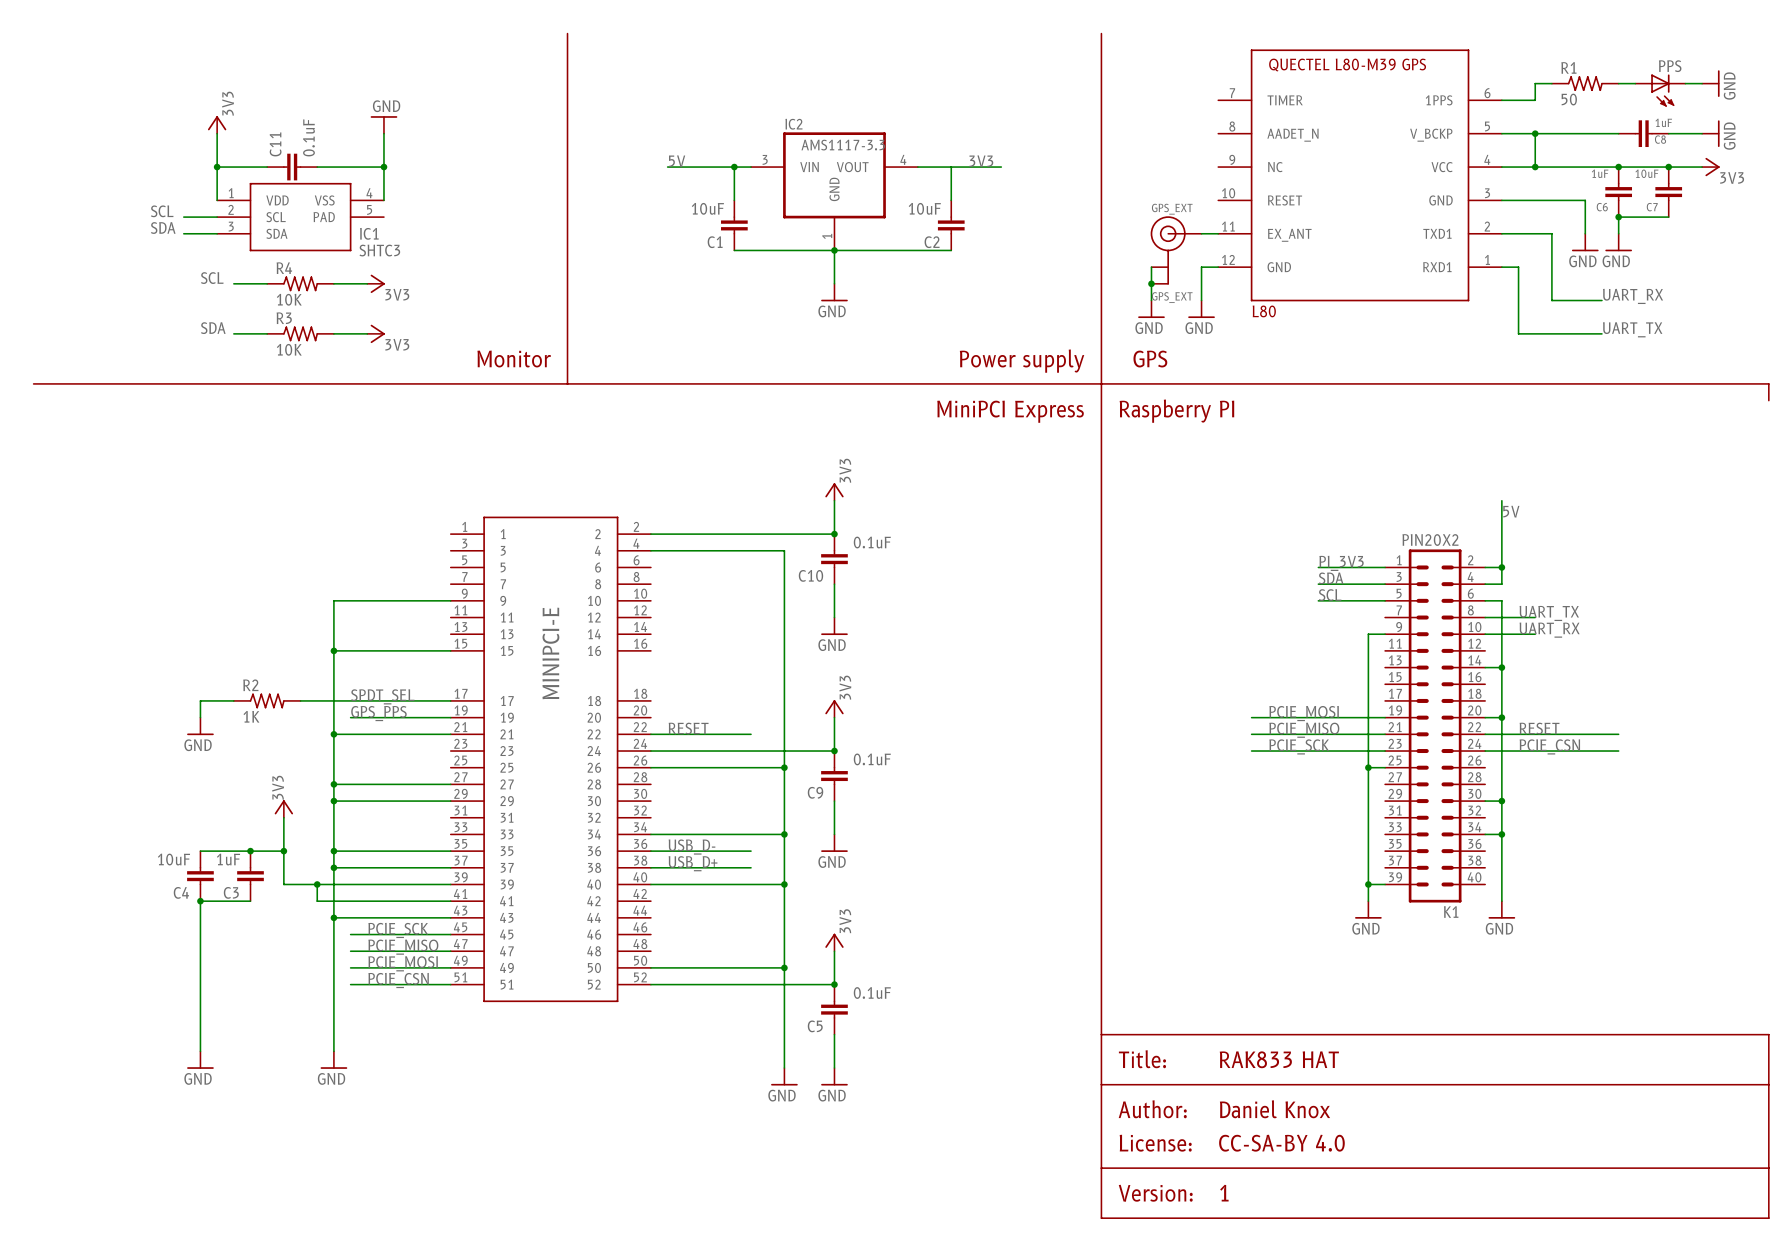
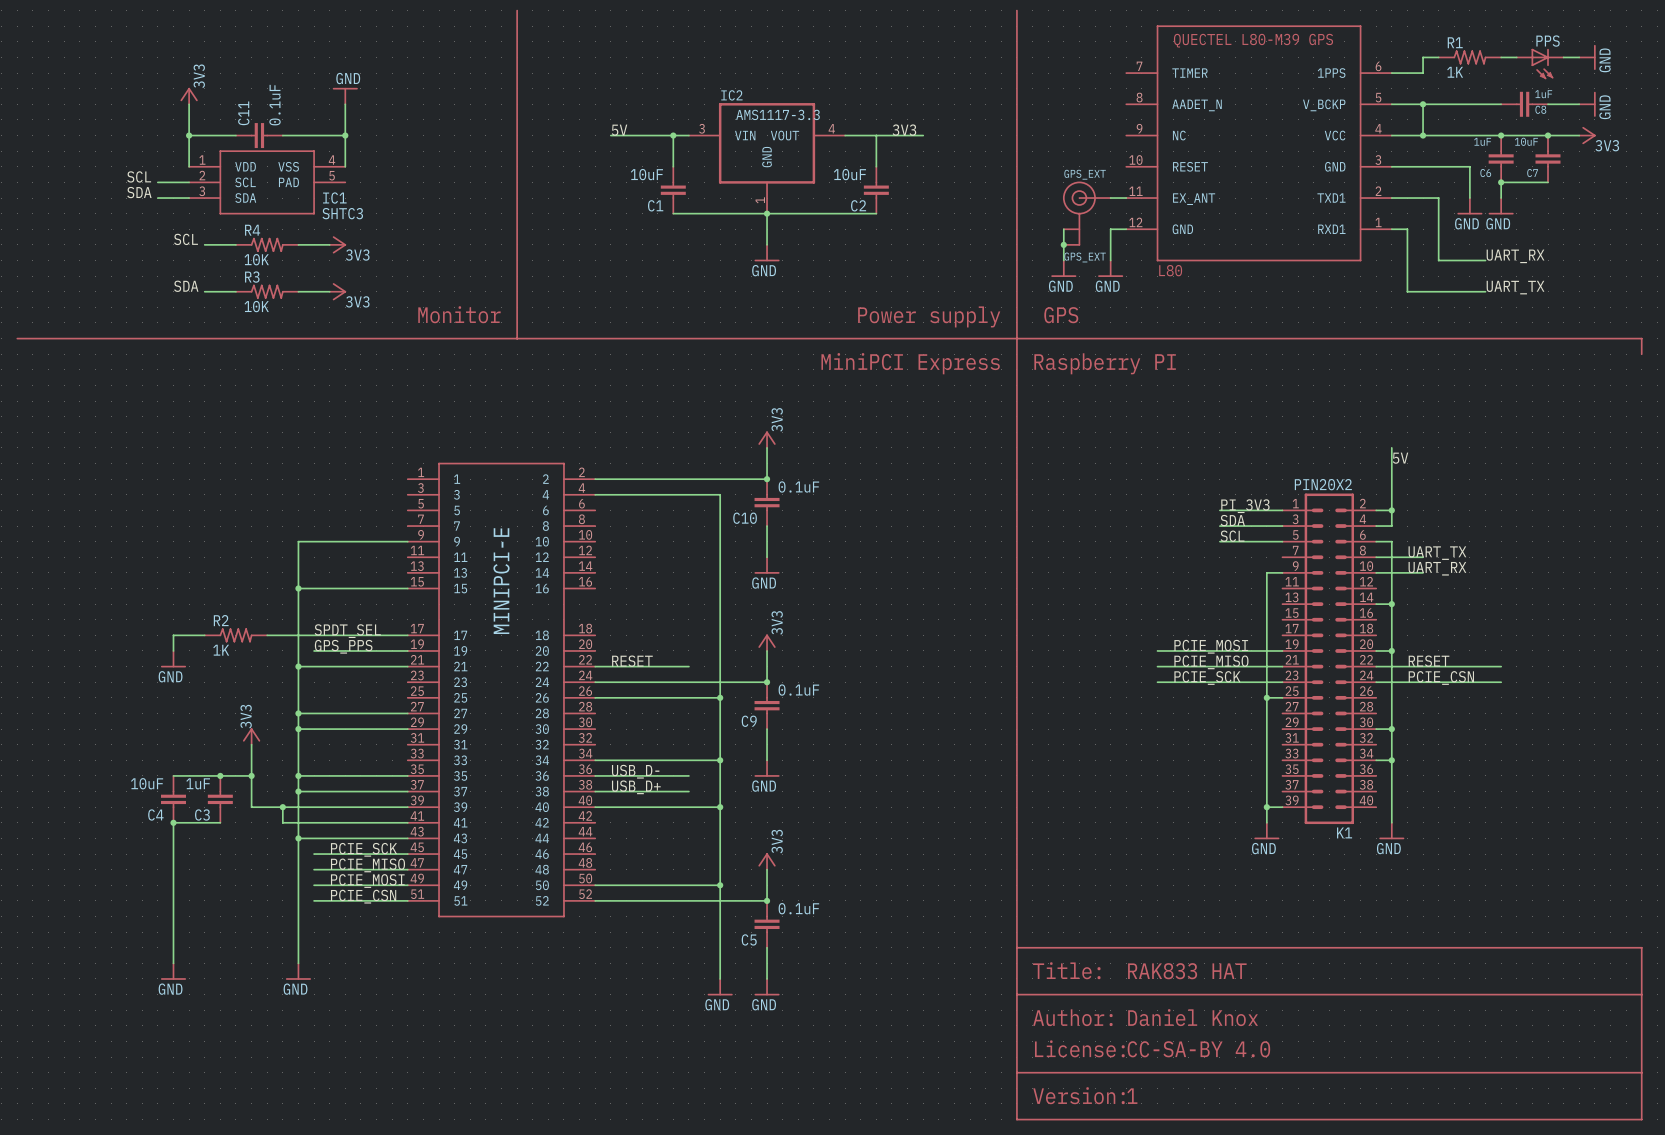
R1 value: 50 (1569, 99) -> 1K (1455, 72)

